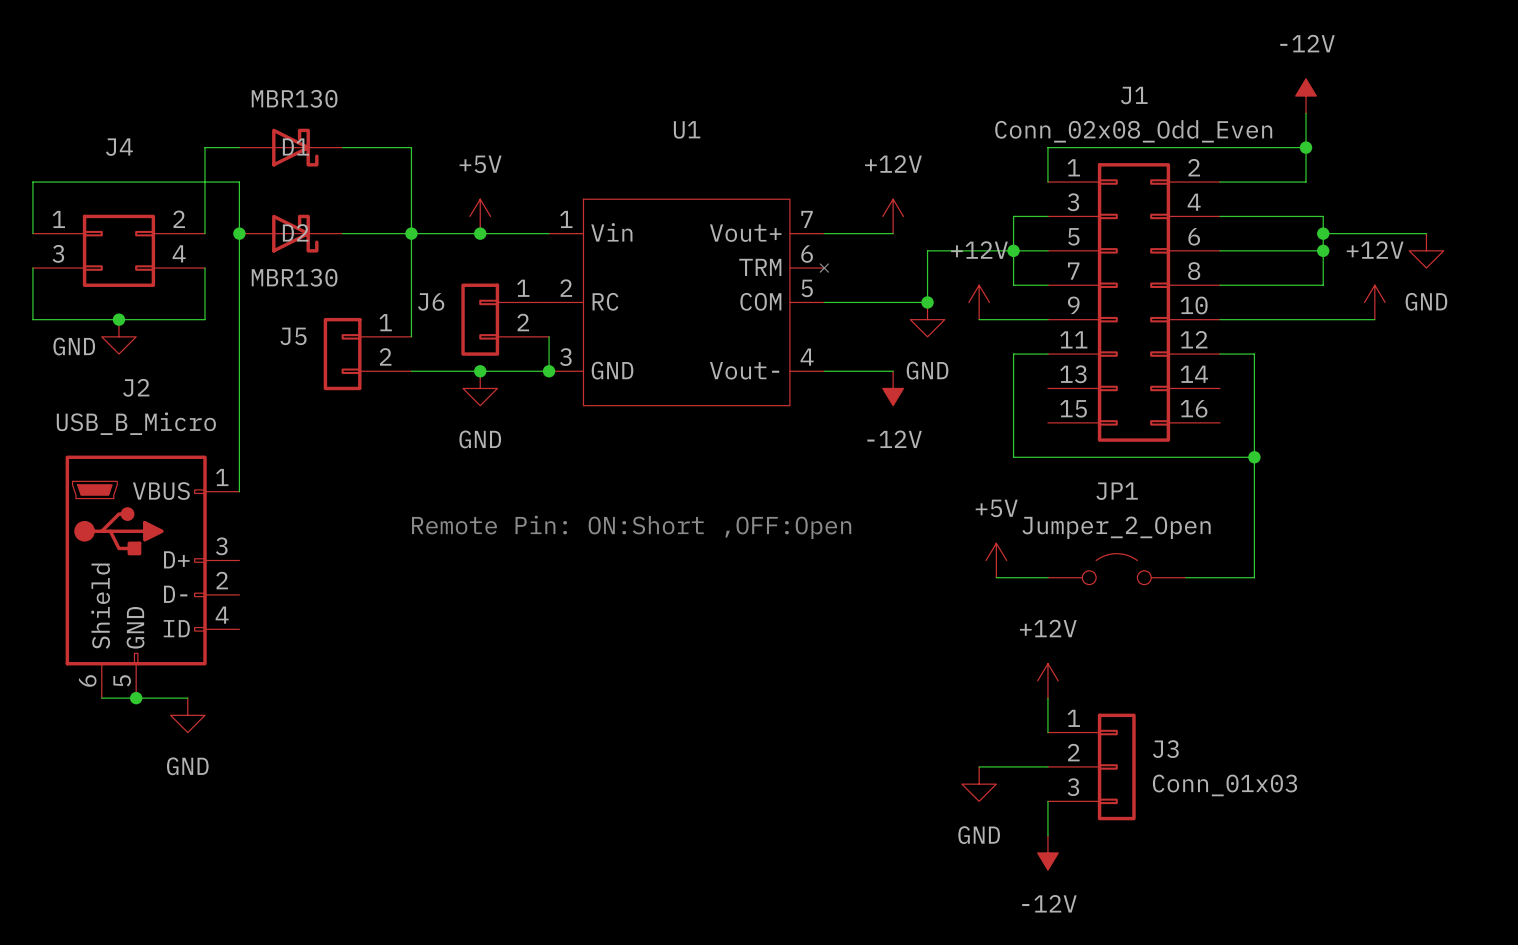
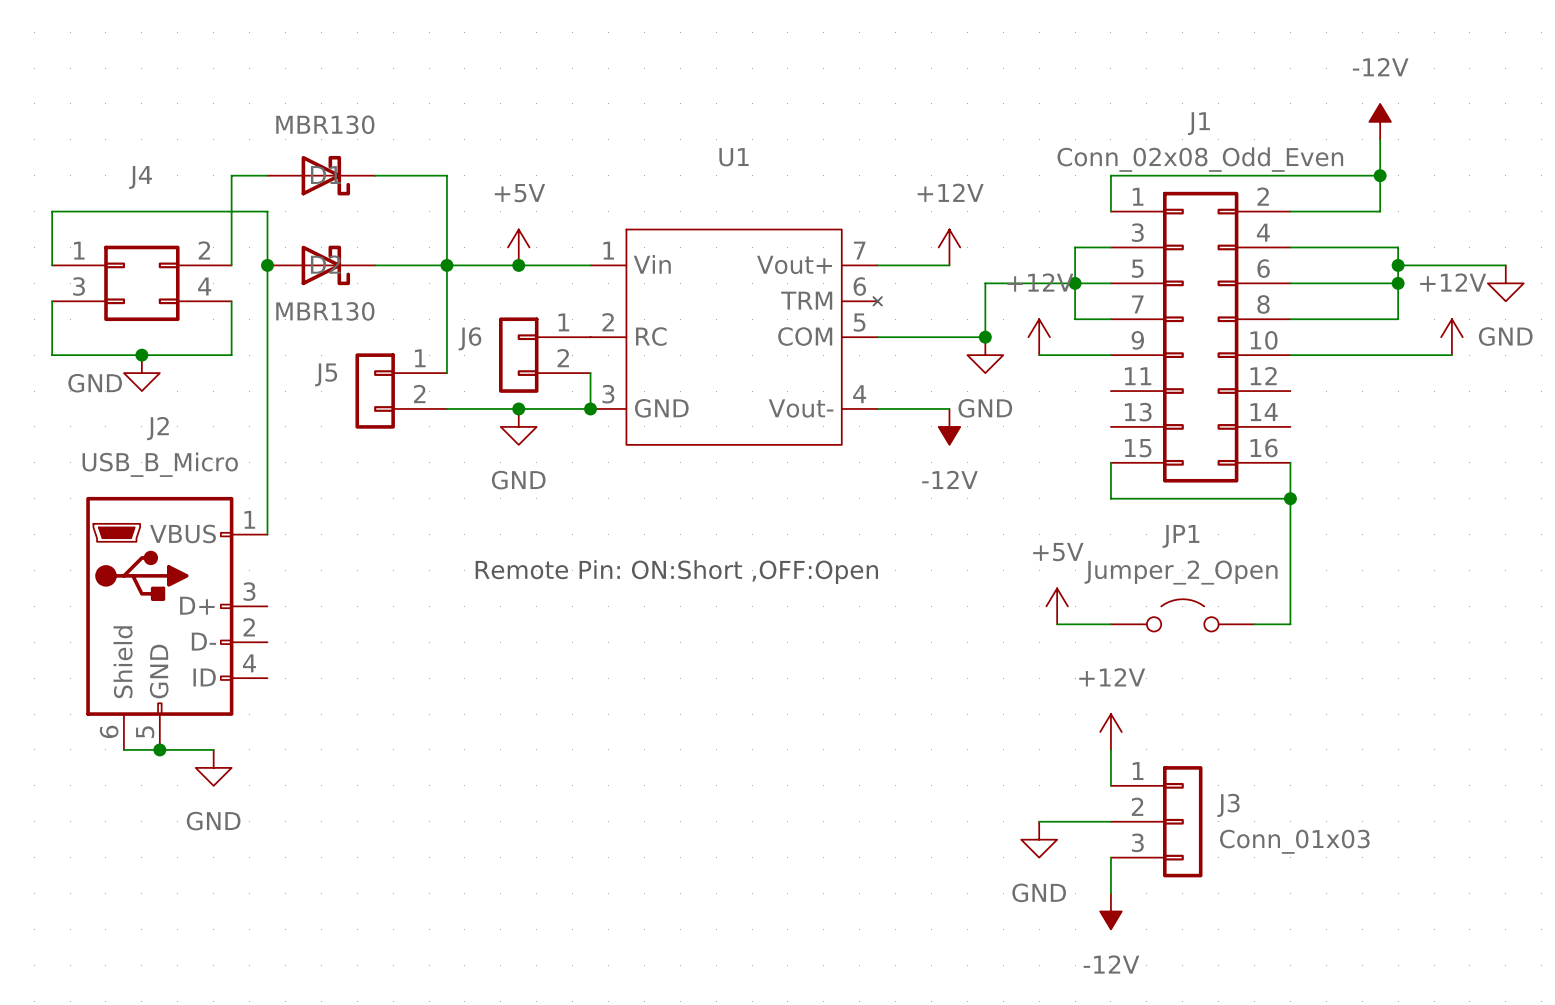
wire: (1047, 354) (1013, 354) (1013, 457) (1047, 457) -> (1110, 462) (1110, 498)
wire: (1220, 354) (1254, 354) (1254, 577) (1220, 577) -> (1290, 462) (1290, 624)
wire: (1220, 457) (1254, 457) -> none
junction position: (1254, 457) -> (1290, 498)

